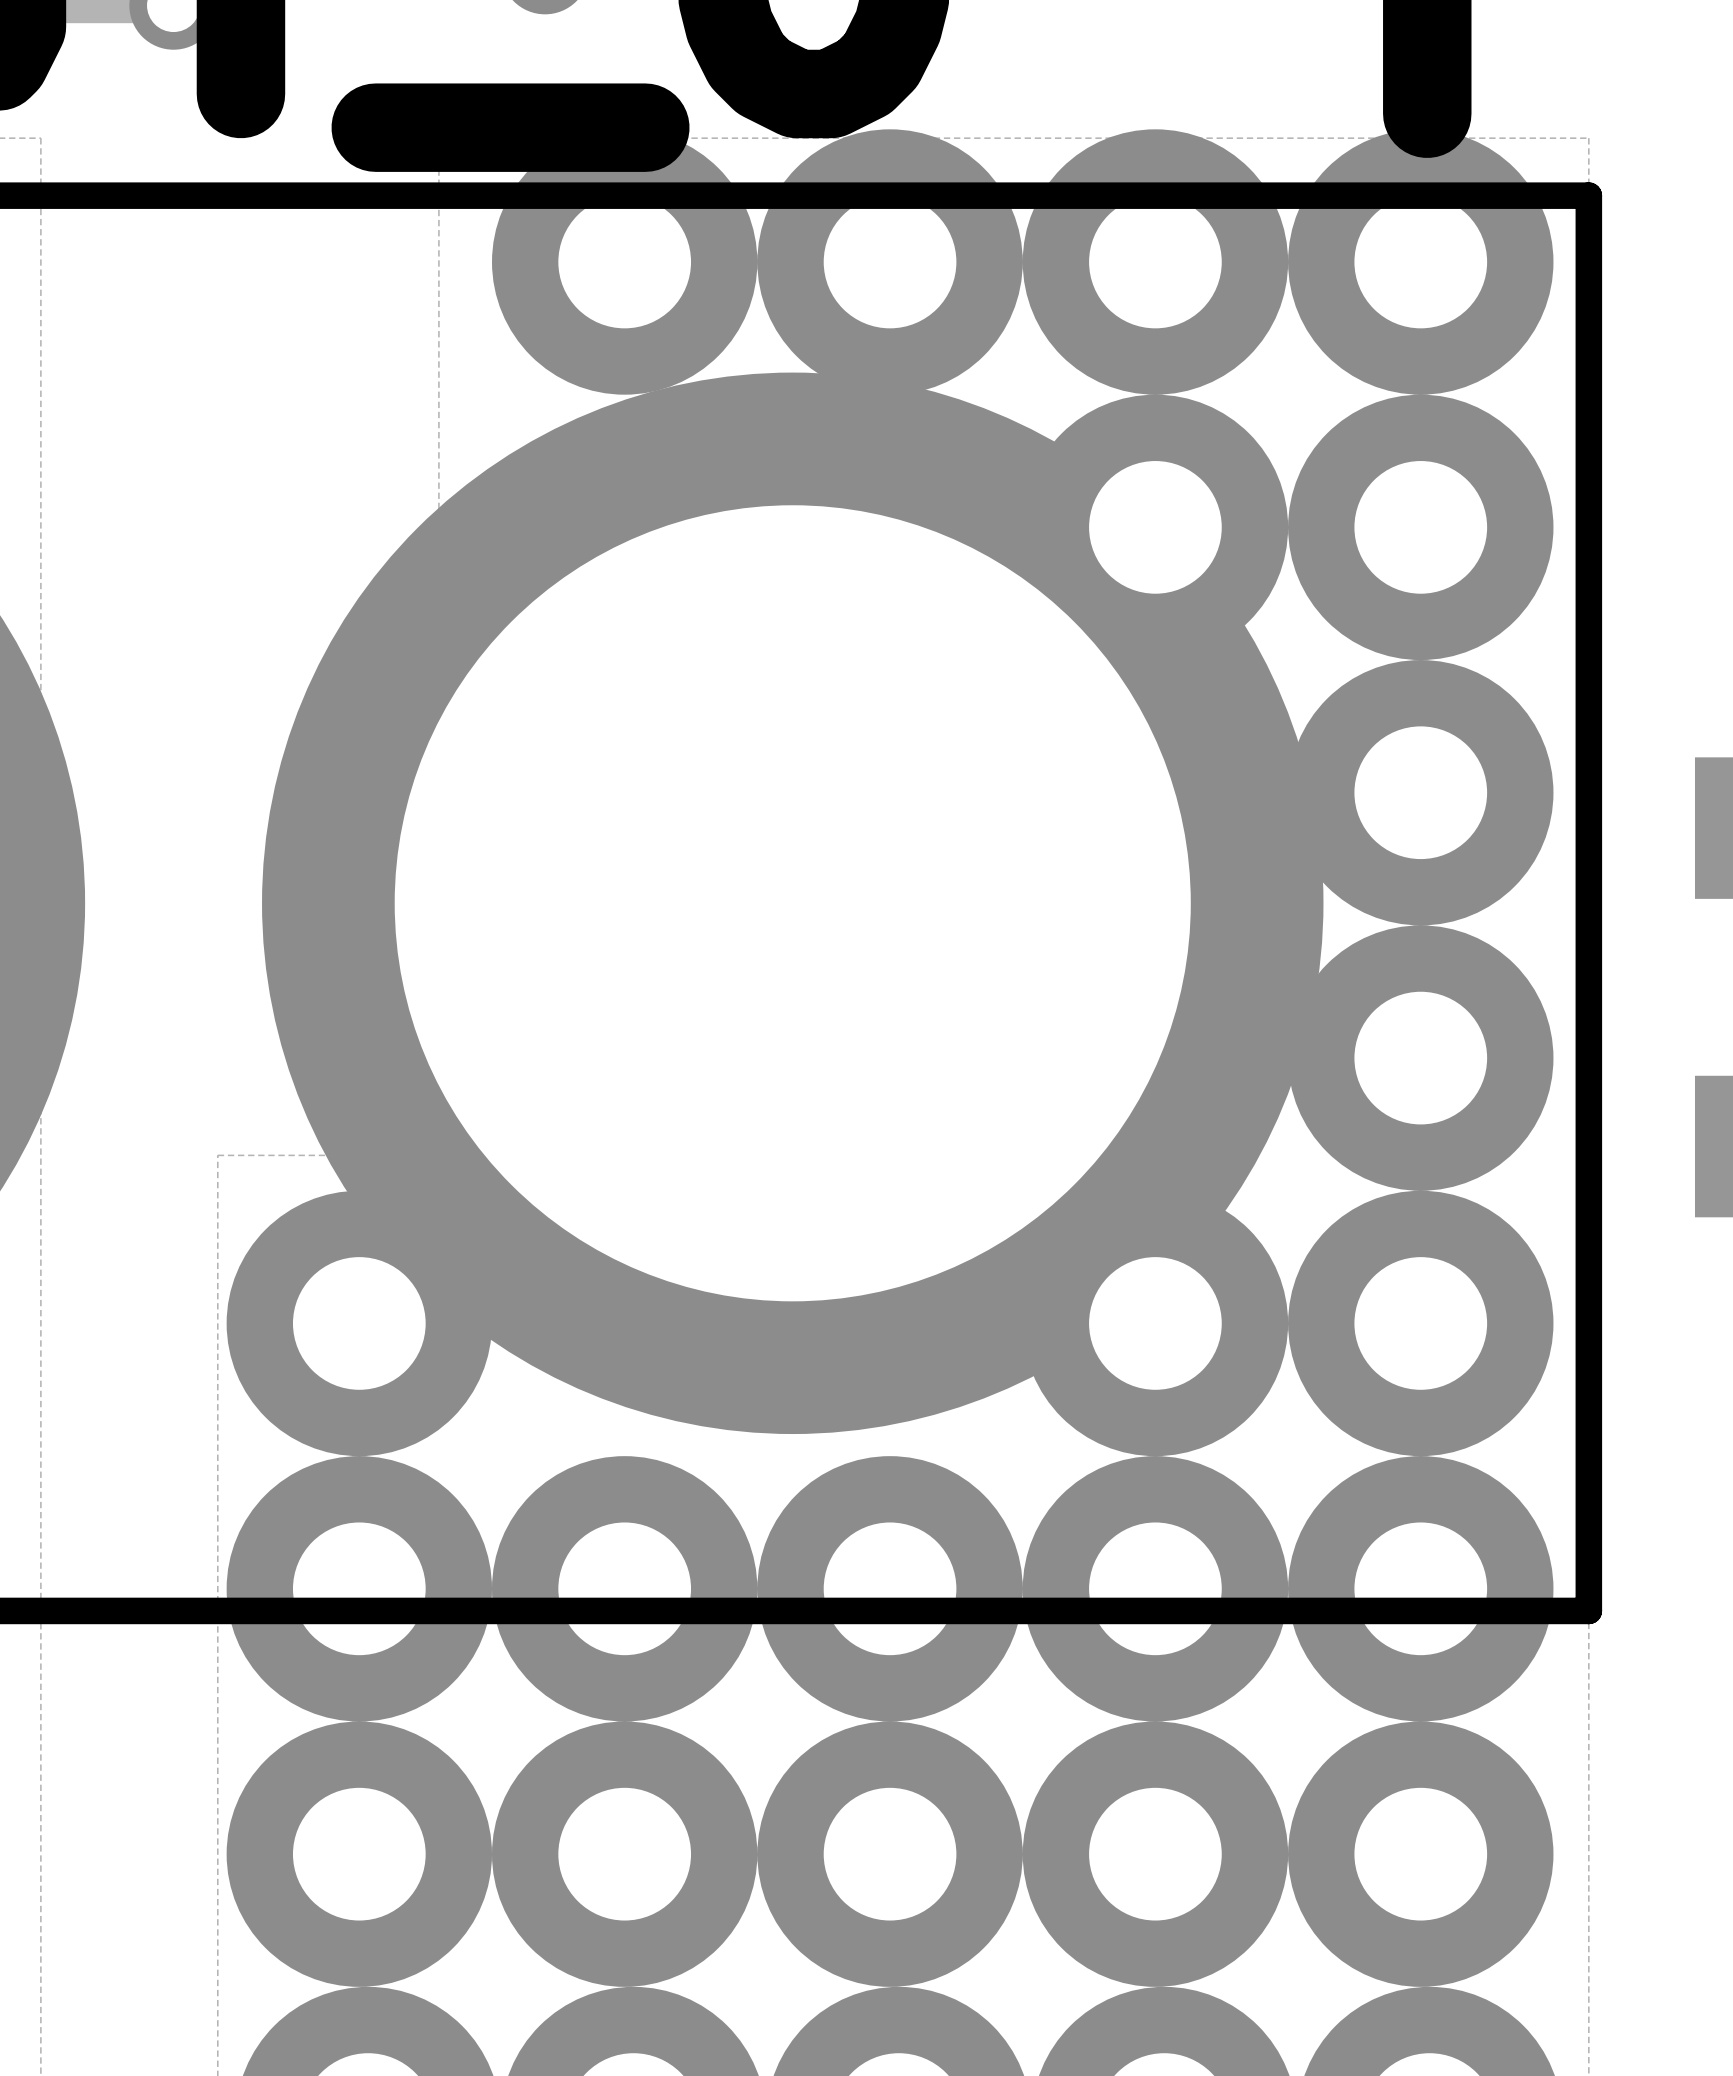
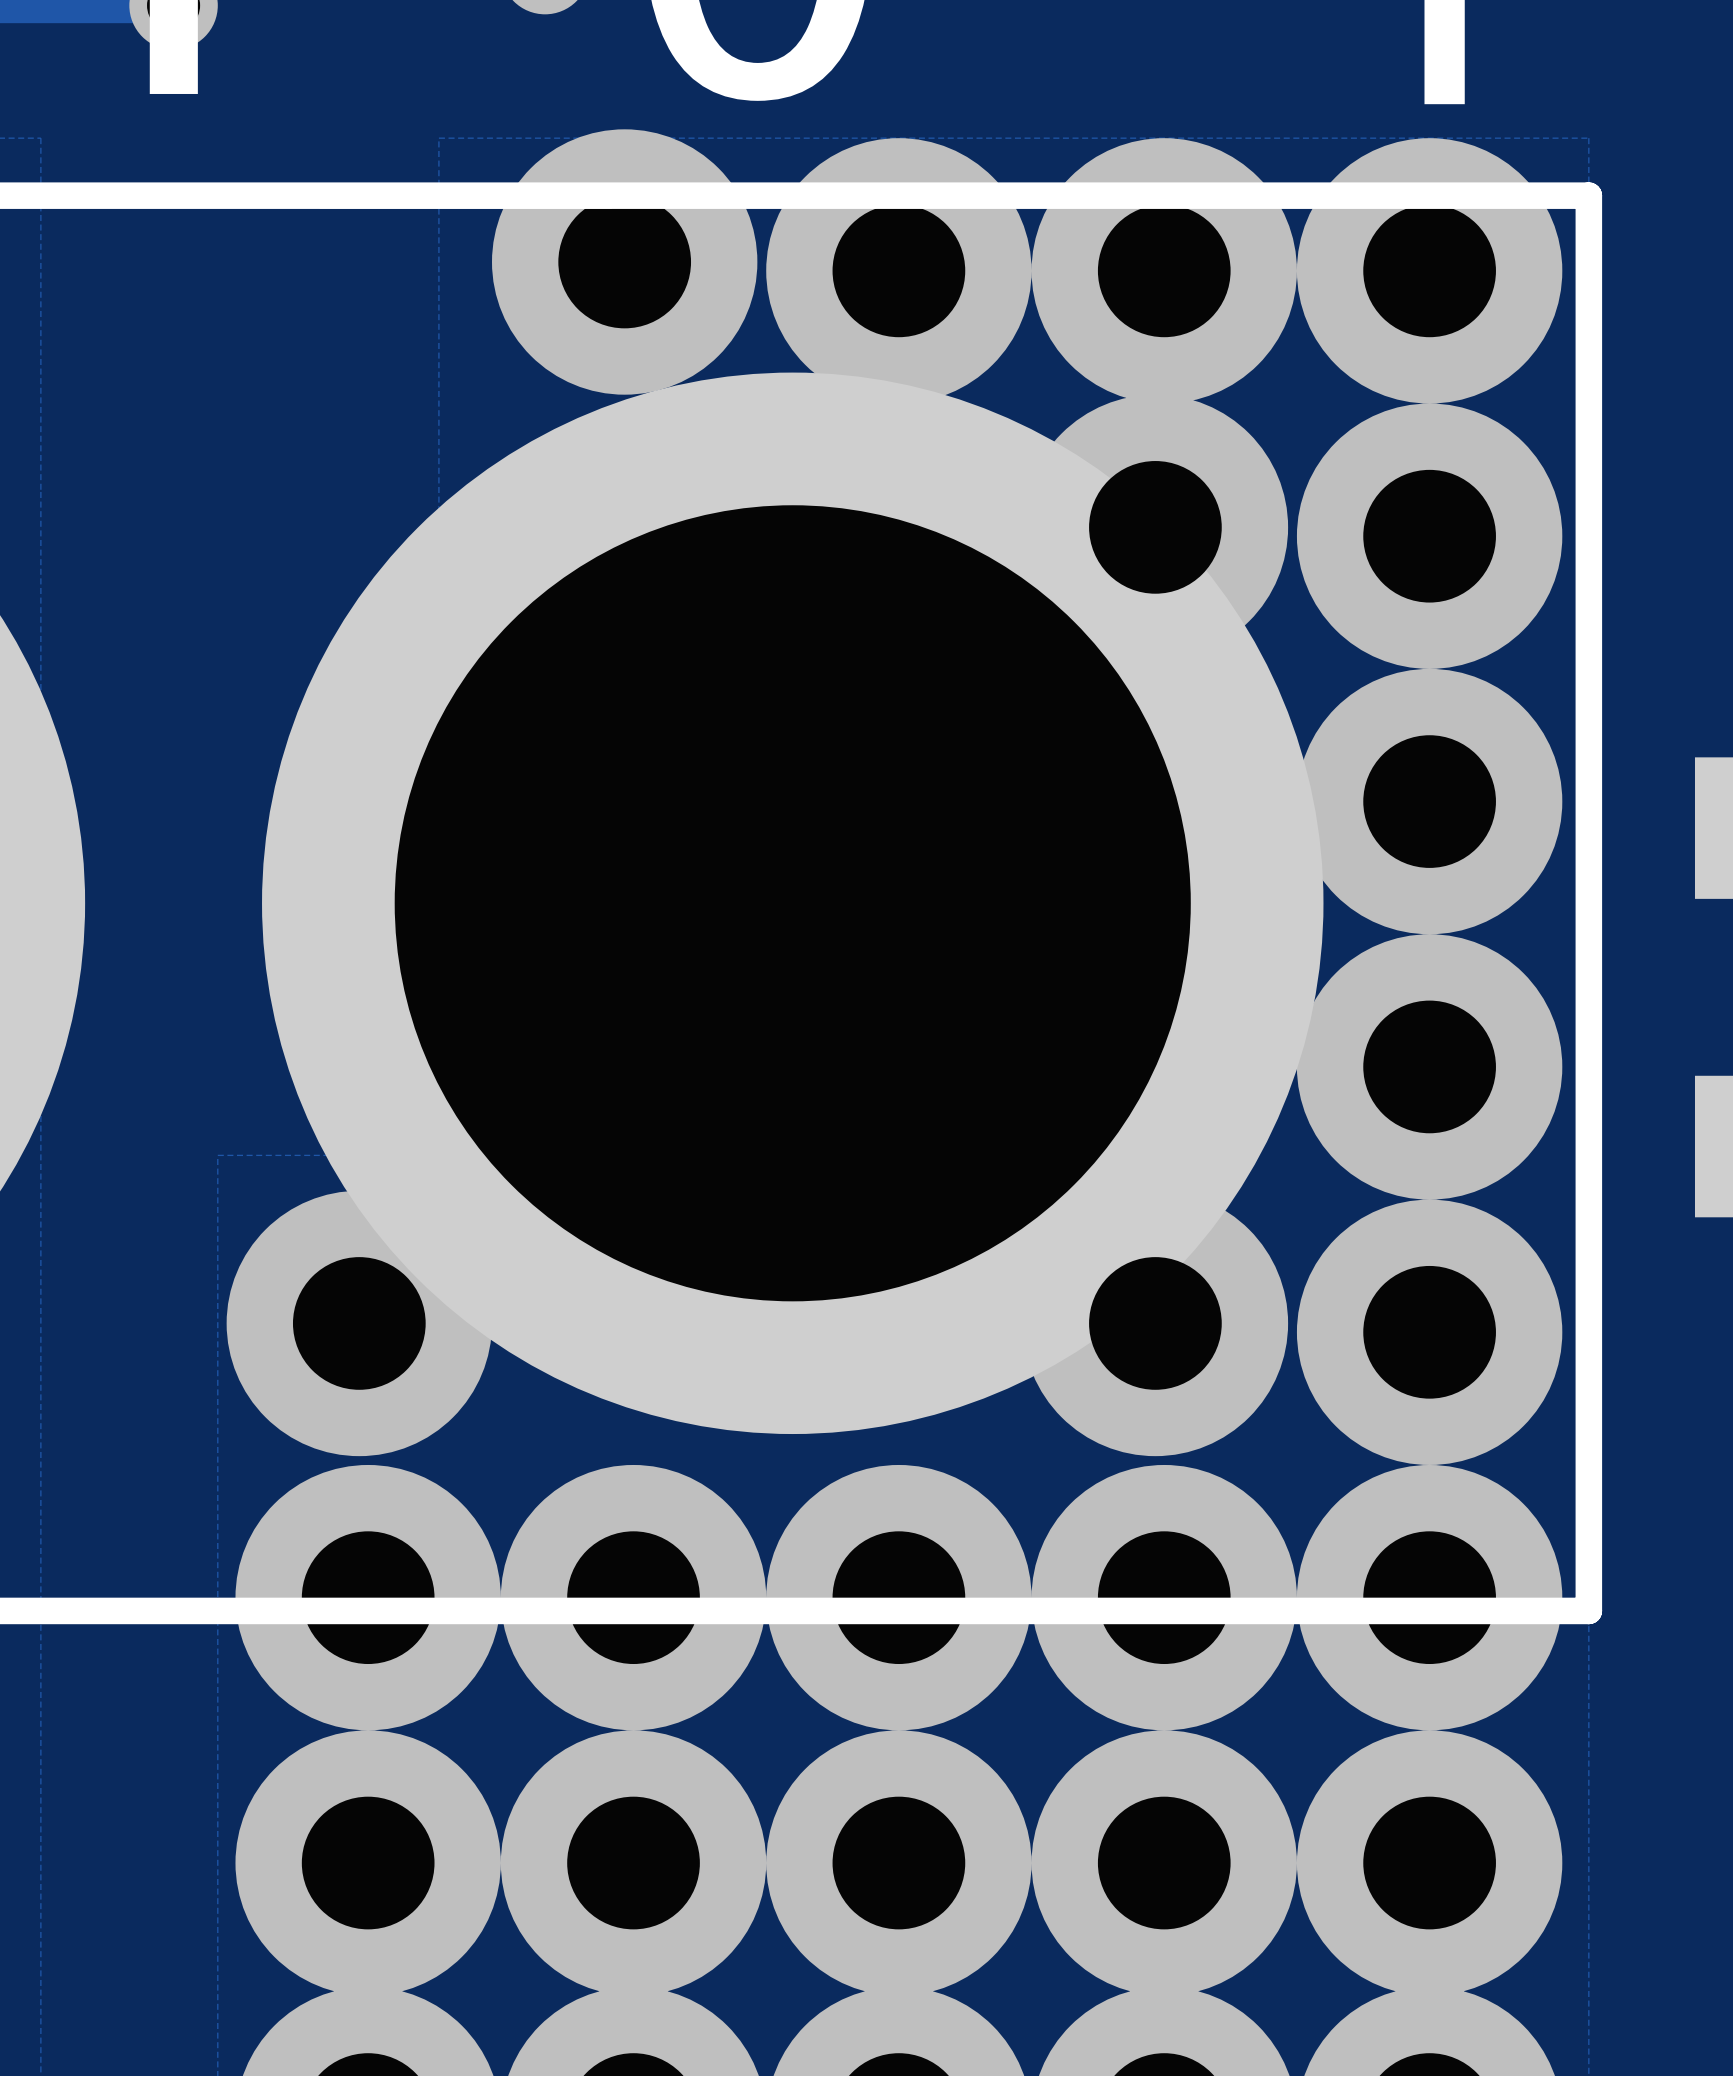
via position: (890, 262) -> (898, 270)
via position: (1155, 262) -> (1164, 270)
via position: (1420, 262) -> (1429, 270)
via position: (1420, 527) -> (1429, 536)
via position: (1420, 792) -> (1429, 801)
via position: (1420, 1058) -> (1429, 1066)
via position: (1420, 1323) -> (1429, 1332)
via position: (359, 1588) -> (368, 1597)
via position: (624, 1588) -> (633, 1597)
via position: (890, 1588) -> (898, 1597)
via position: (1155, 1588) -> (1164, 1597)
via position: (1420, 1588) -> (1429, 1597)
via position: (359, 1854) -> (368, 1863)
via position: (624, 1854) -> (633, 1863)
via position: (890, 1854) -> (898, 1863)
via position: (1155, 1854) -> (1164, 1863)
via position: (1420, 1854) -> (1429, 1863)

